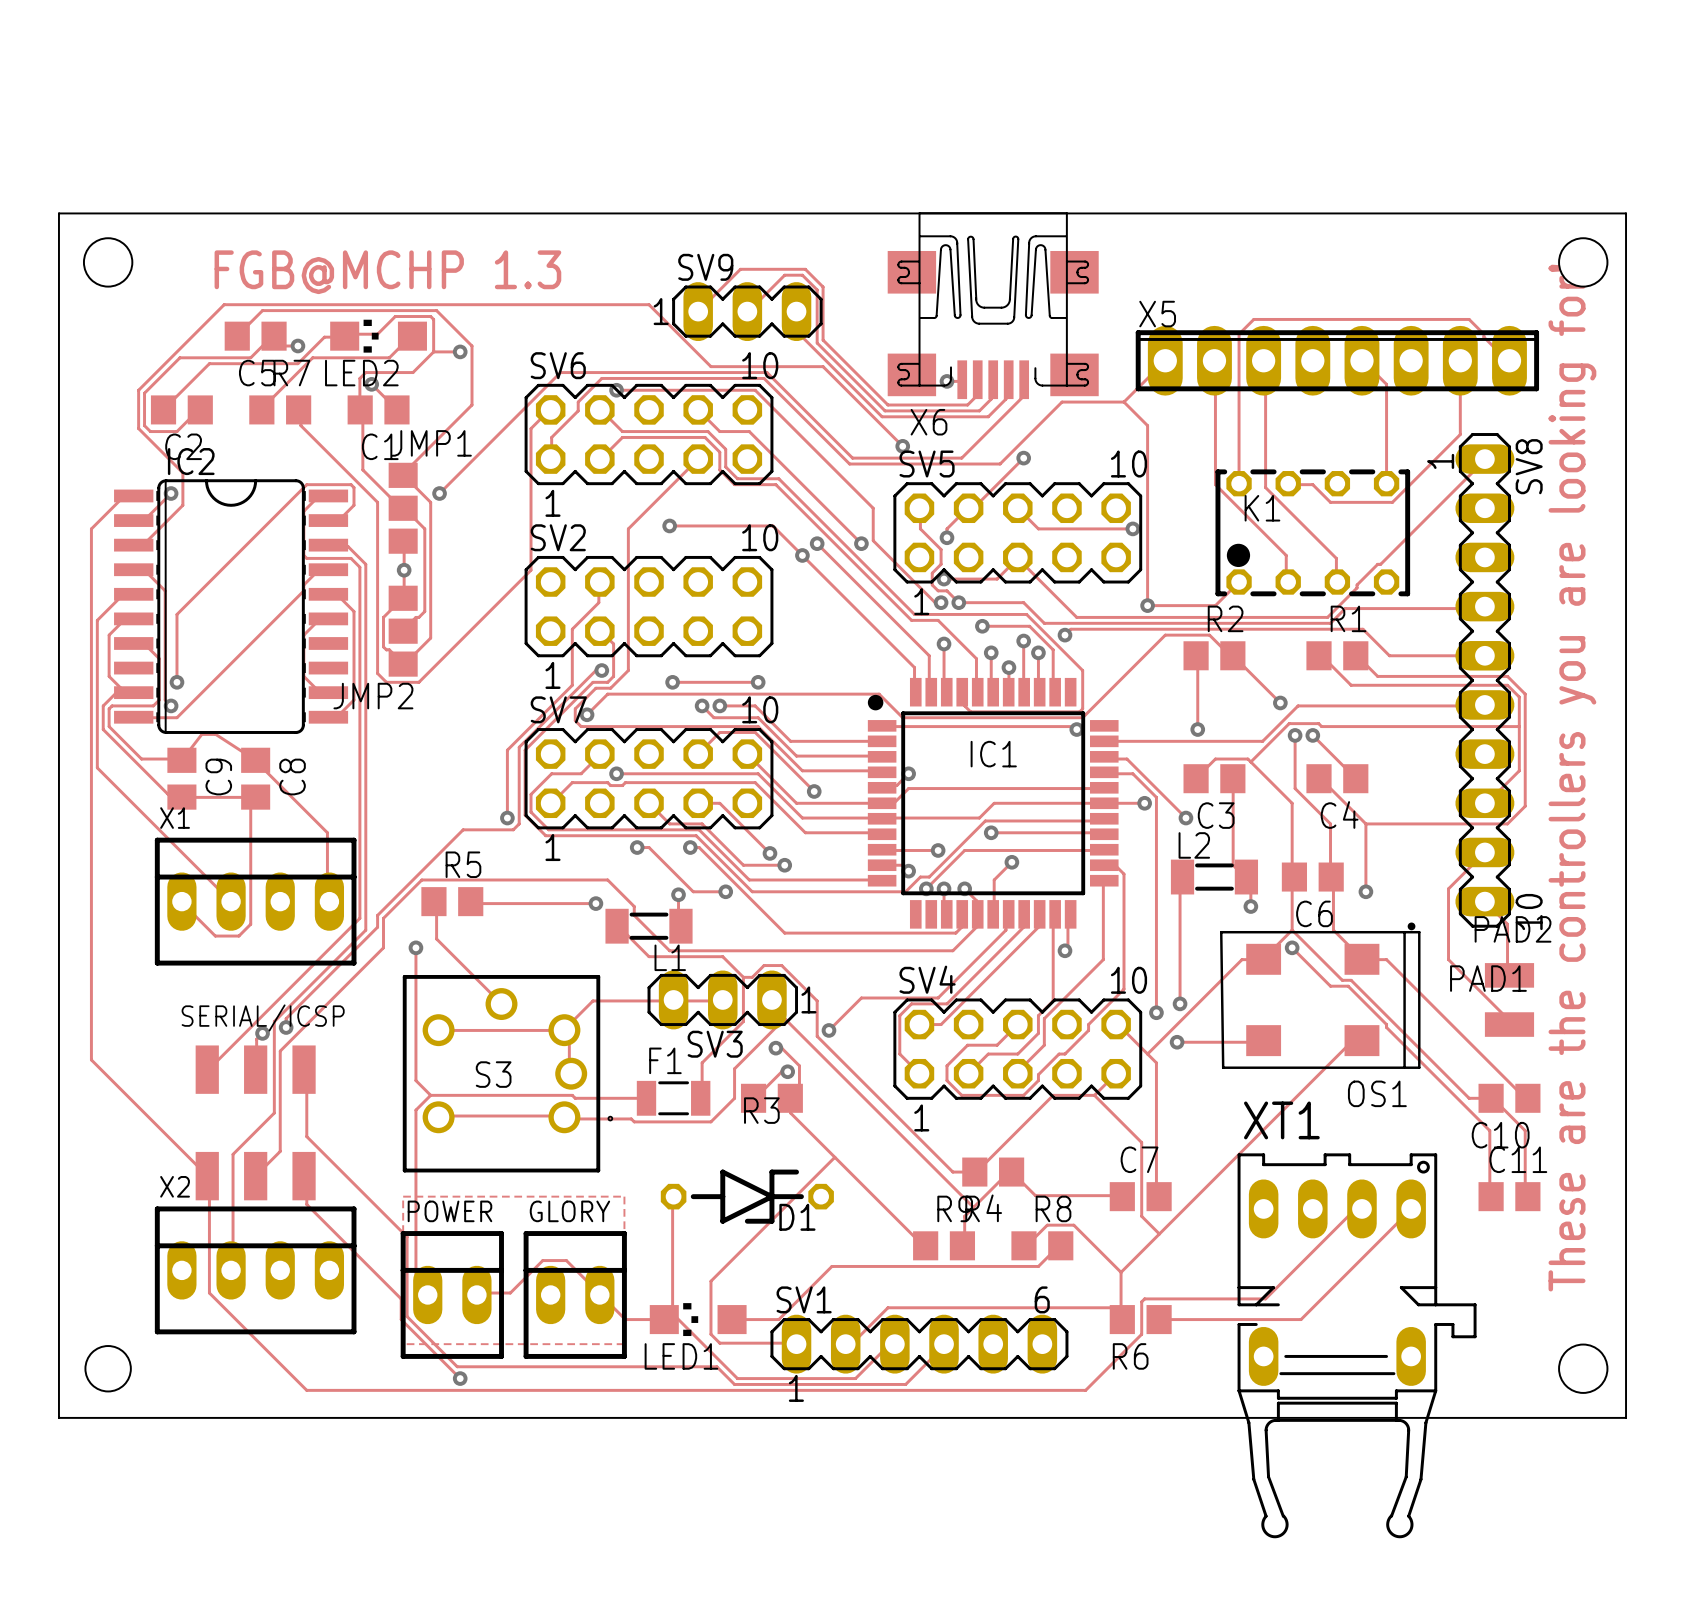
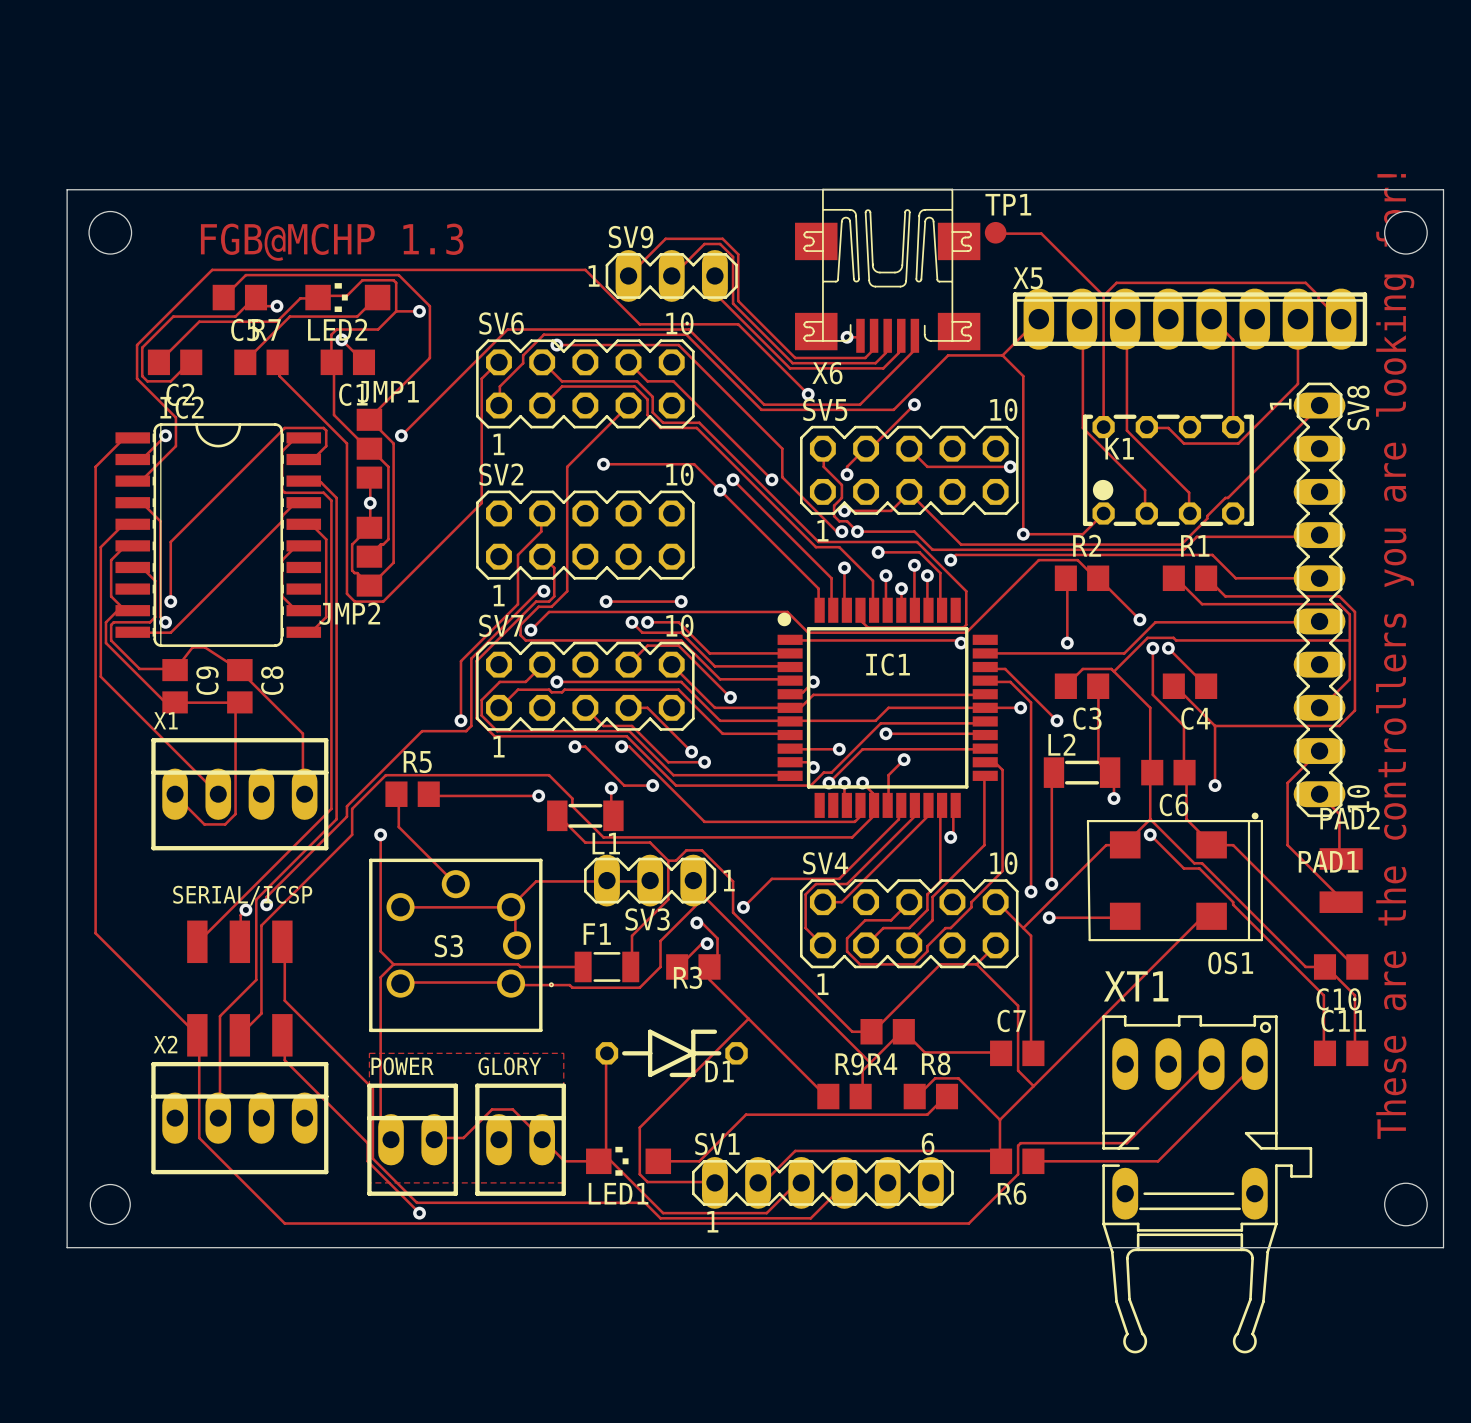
track: none -> (995, 232) (1041, 233) (1103, 295)
TP1: none -> (995, 232)

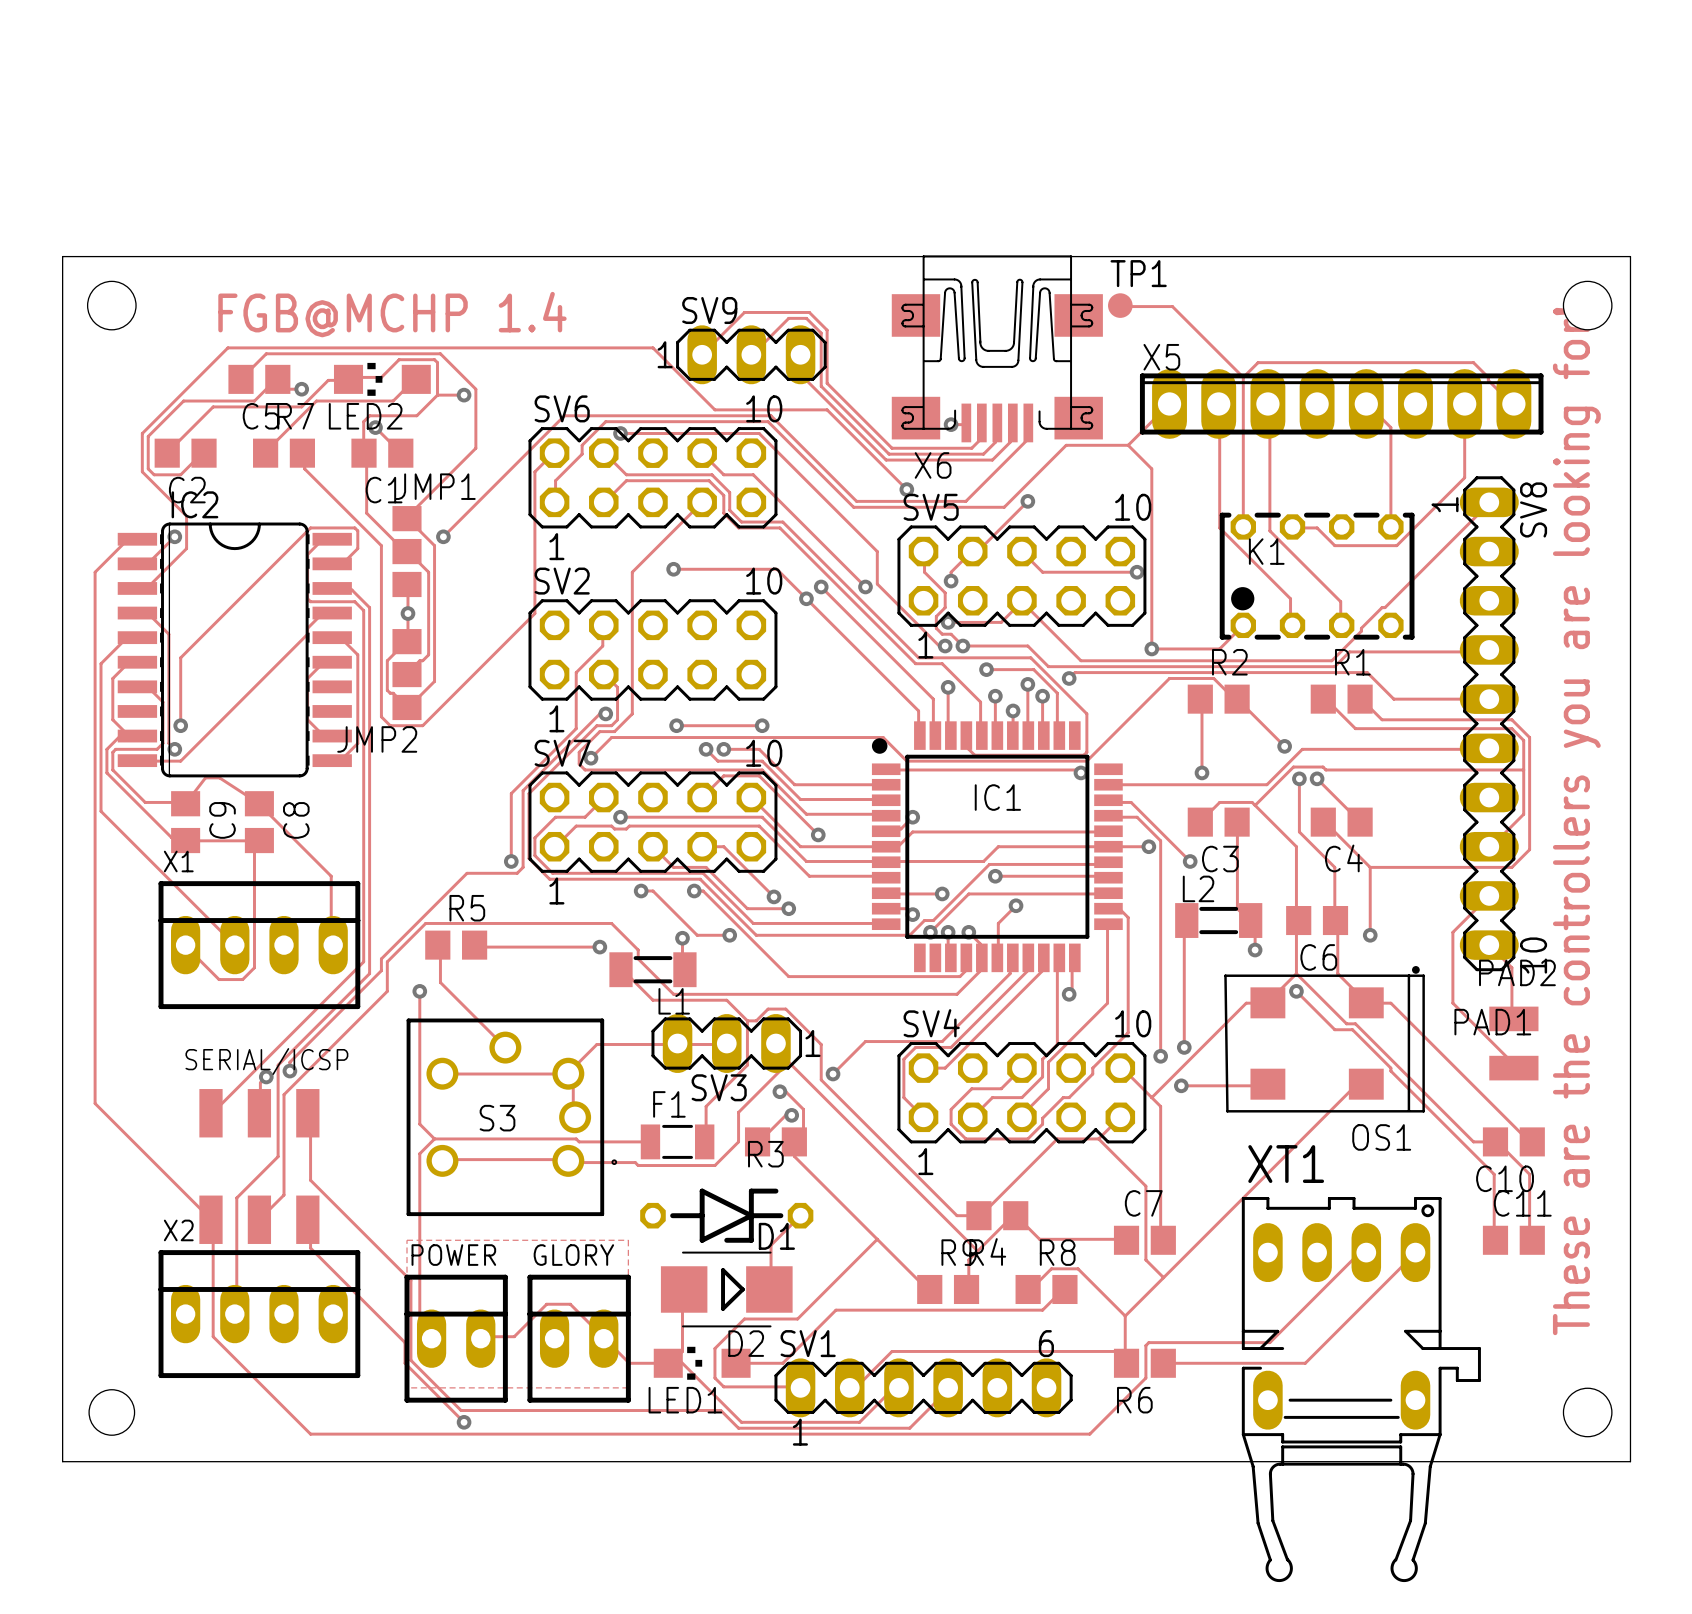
text: FGB@MCHP 1.3 (332, 242) -> FGB@MCHP 1.4 (392, 314)
track: (748, 1018) (639, 1127) (639, 1148) -> (877, 1239) (797, 1319) (744, 1319) (714, 1348)
track: none -> (800, 1215) (771, 1245) (771, 1289) (769, 1289)
track: (606, 1053) (606, 1156) -> (684, 1289) (682, 1289) (682, 1351) (676, 1357)
D1 position: (671, 1053) -> (726, 1215)
D2: none -> (726, 1289)

